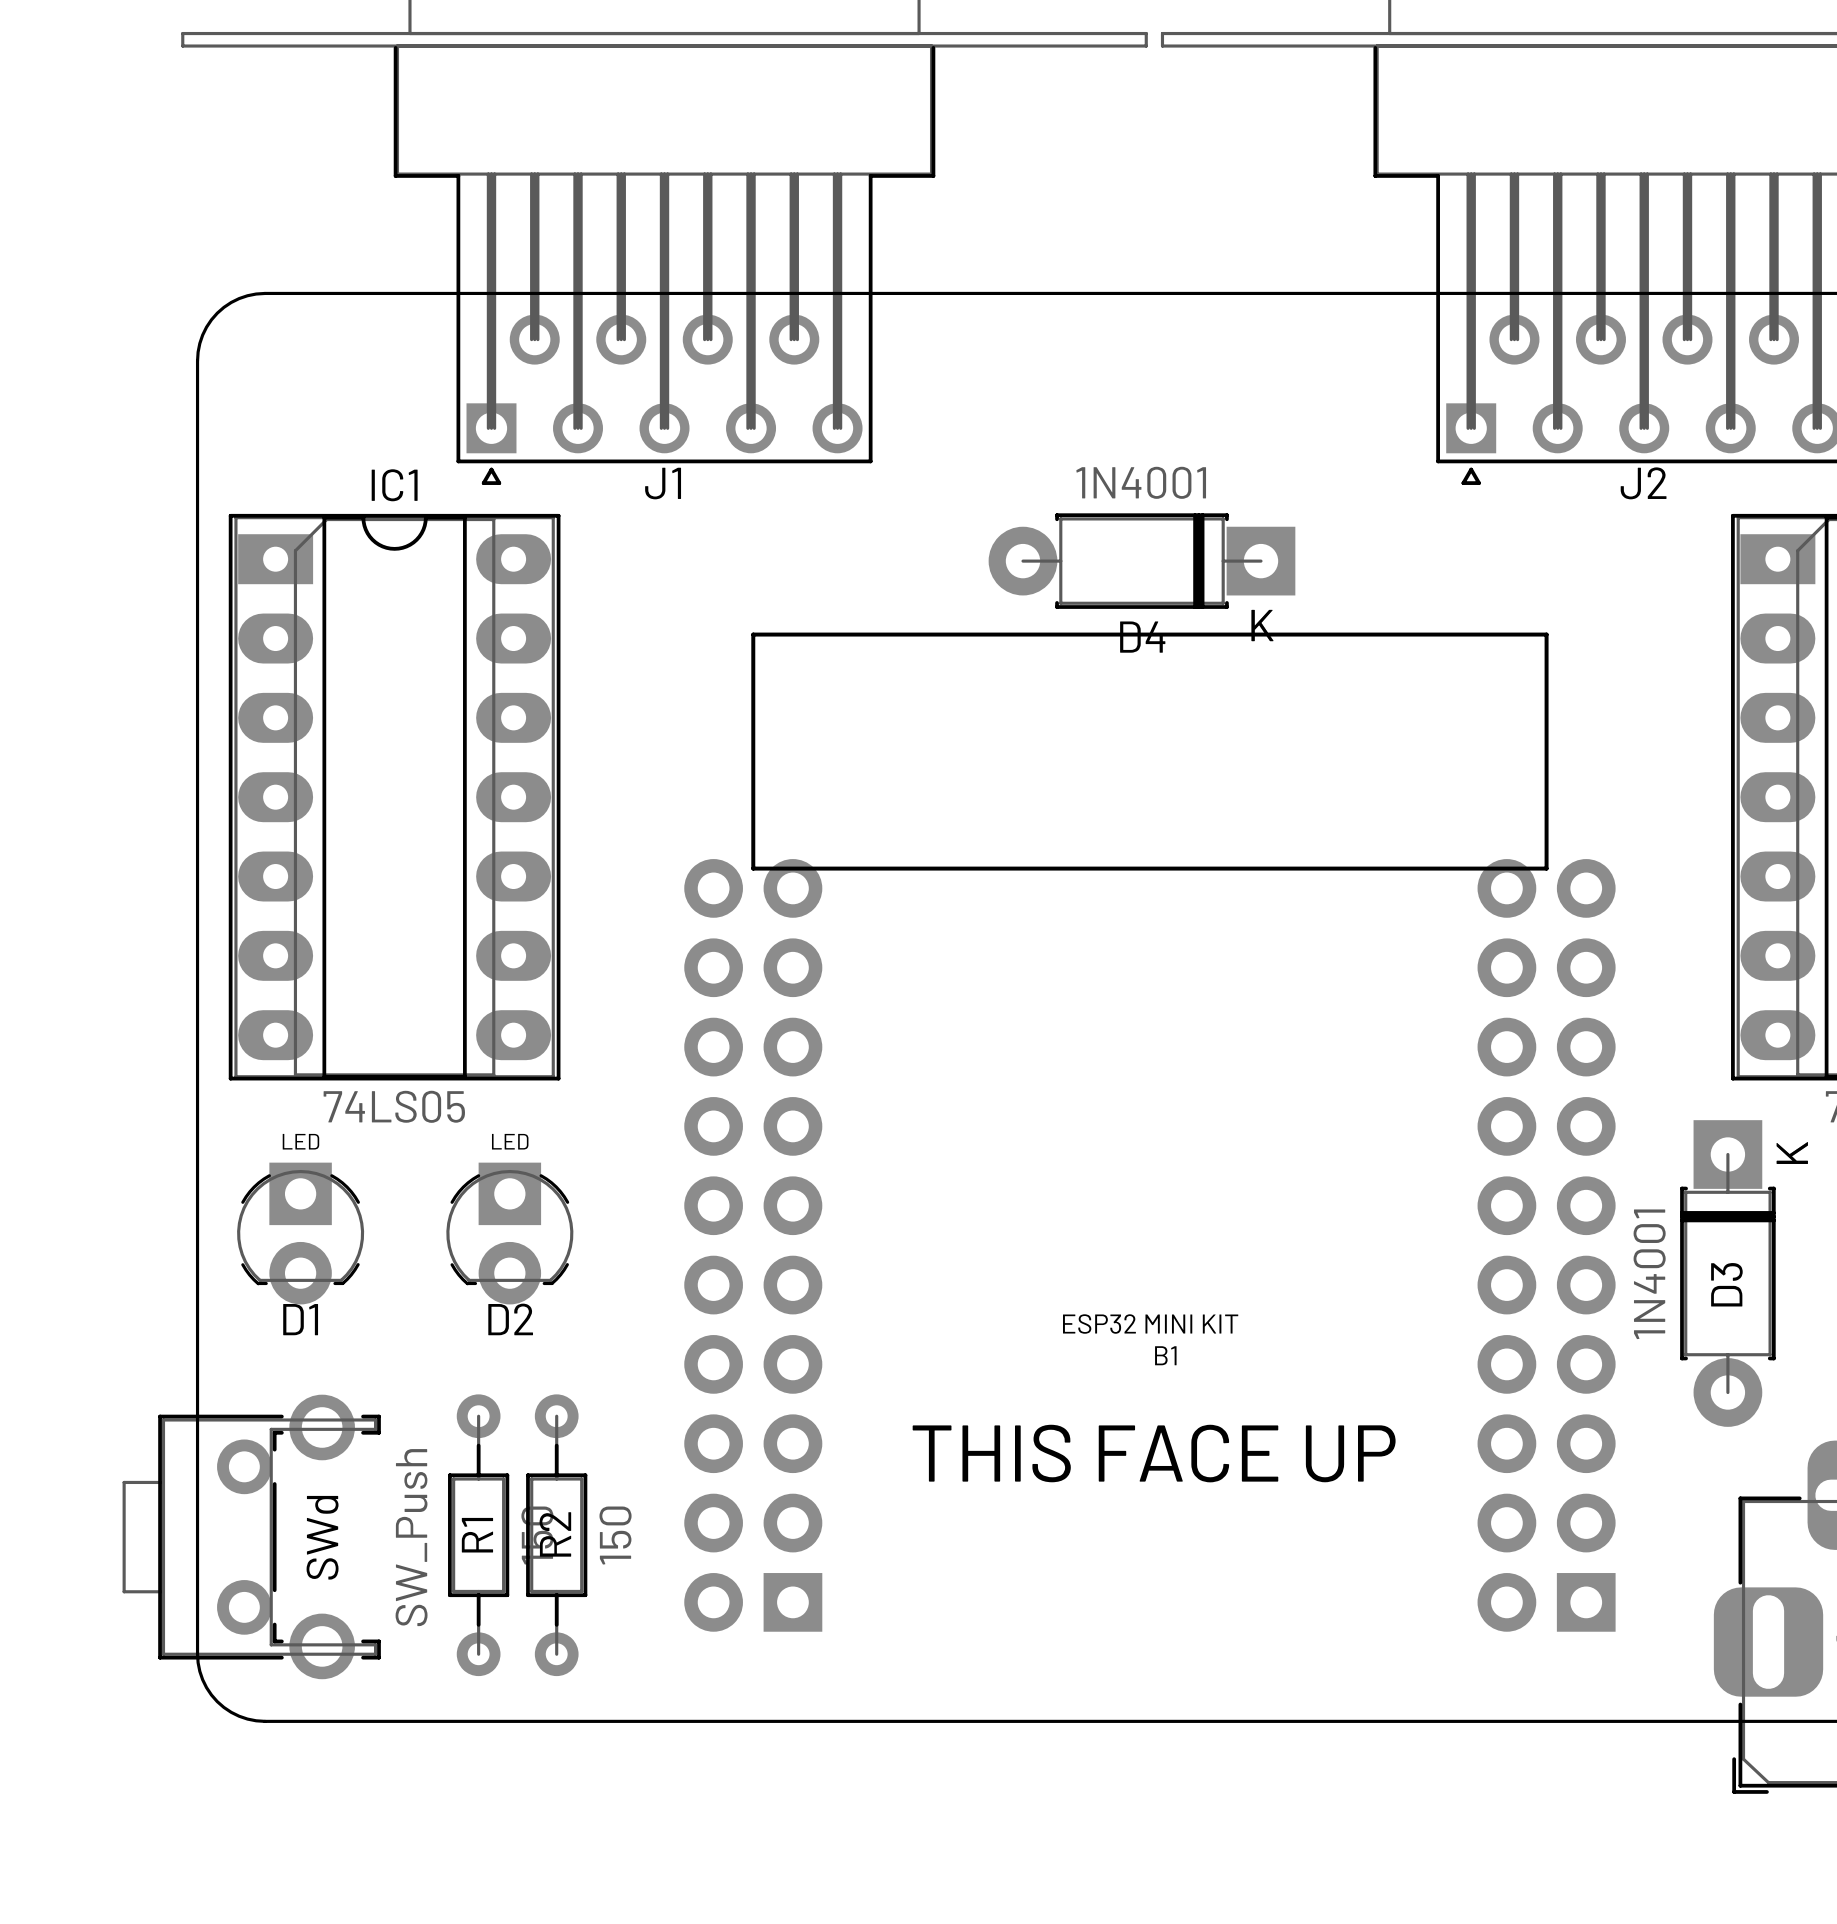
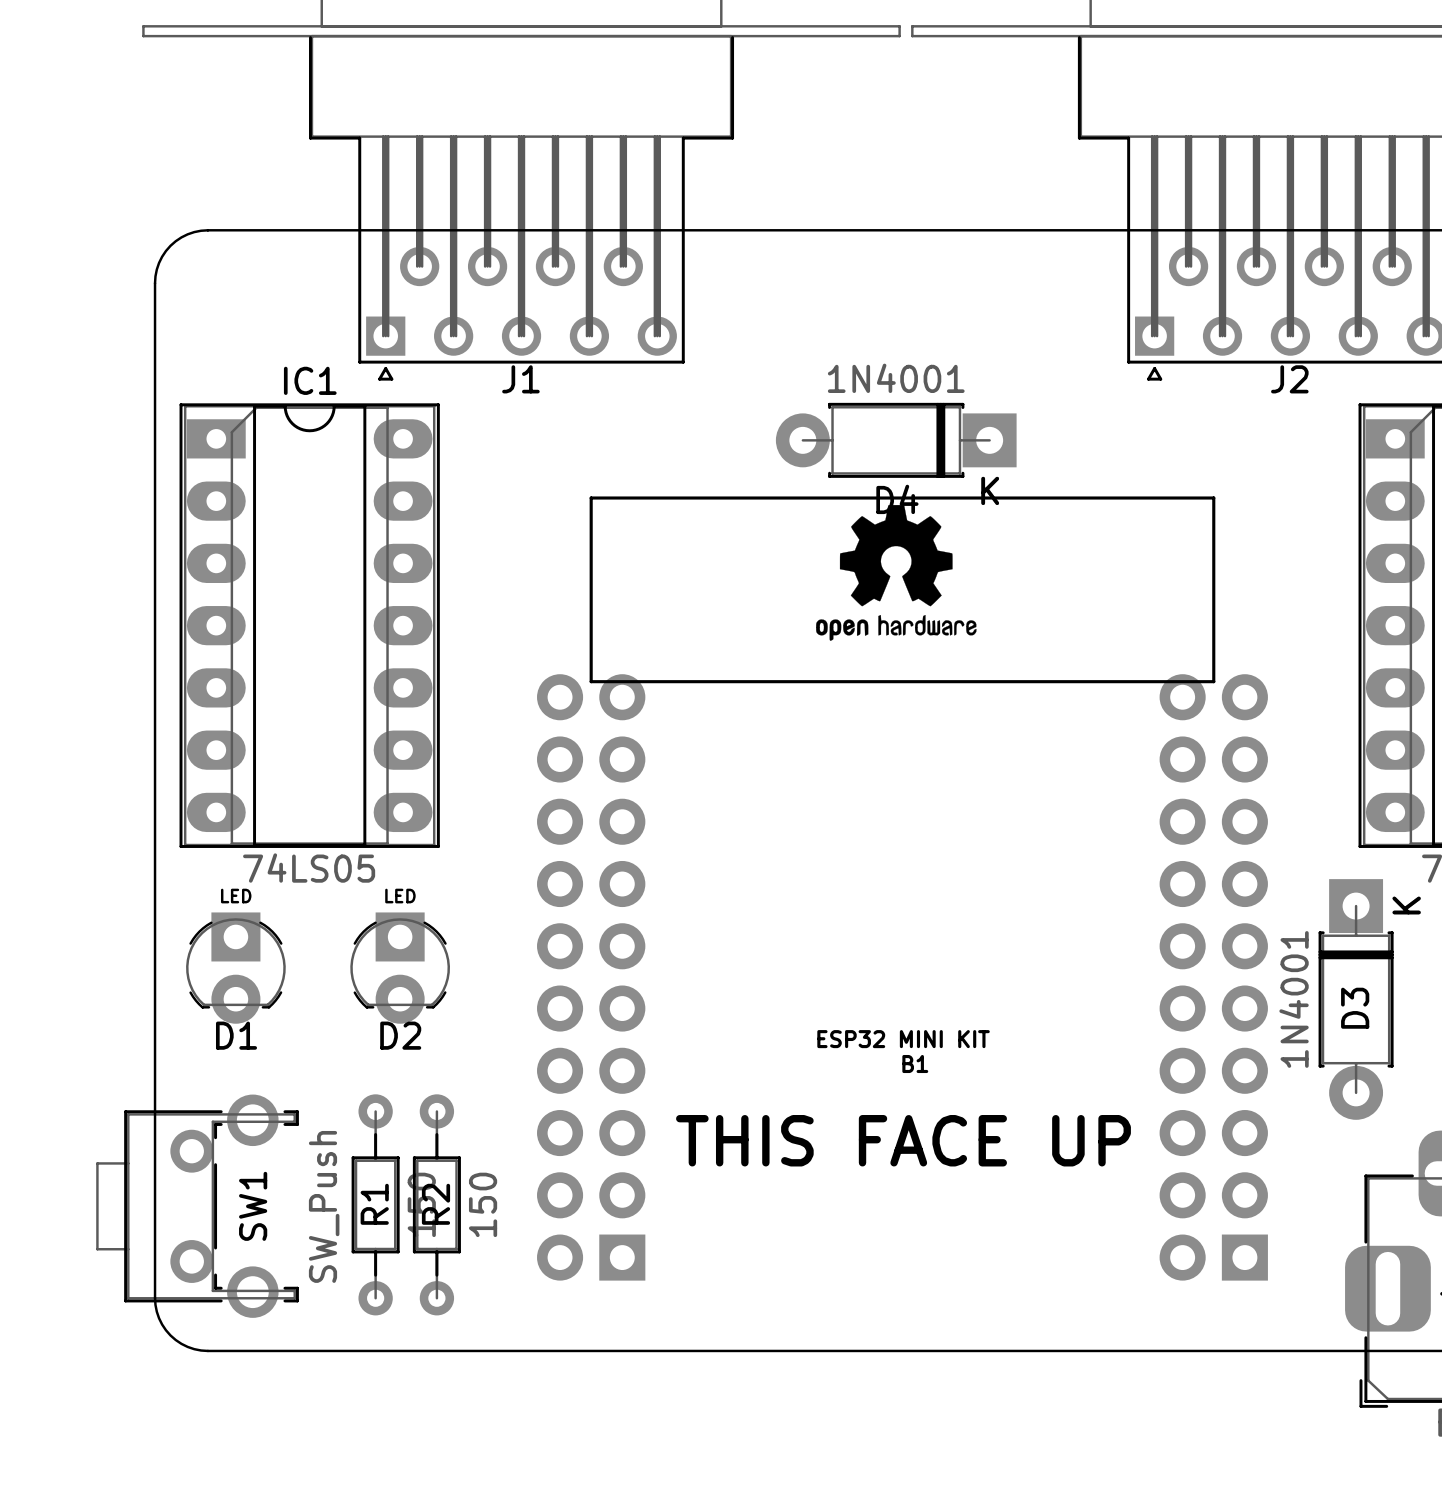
drawing: none -> [816, 505, 977, 641]
SWd name: SWd (322, 1537) -> SW1 (253, 1206)

